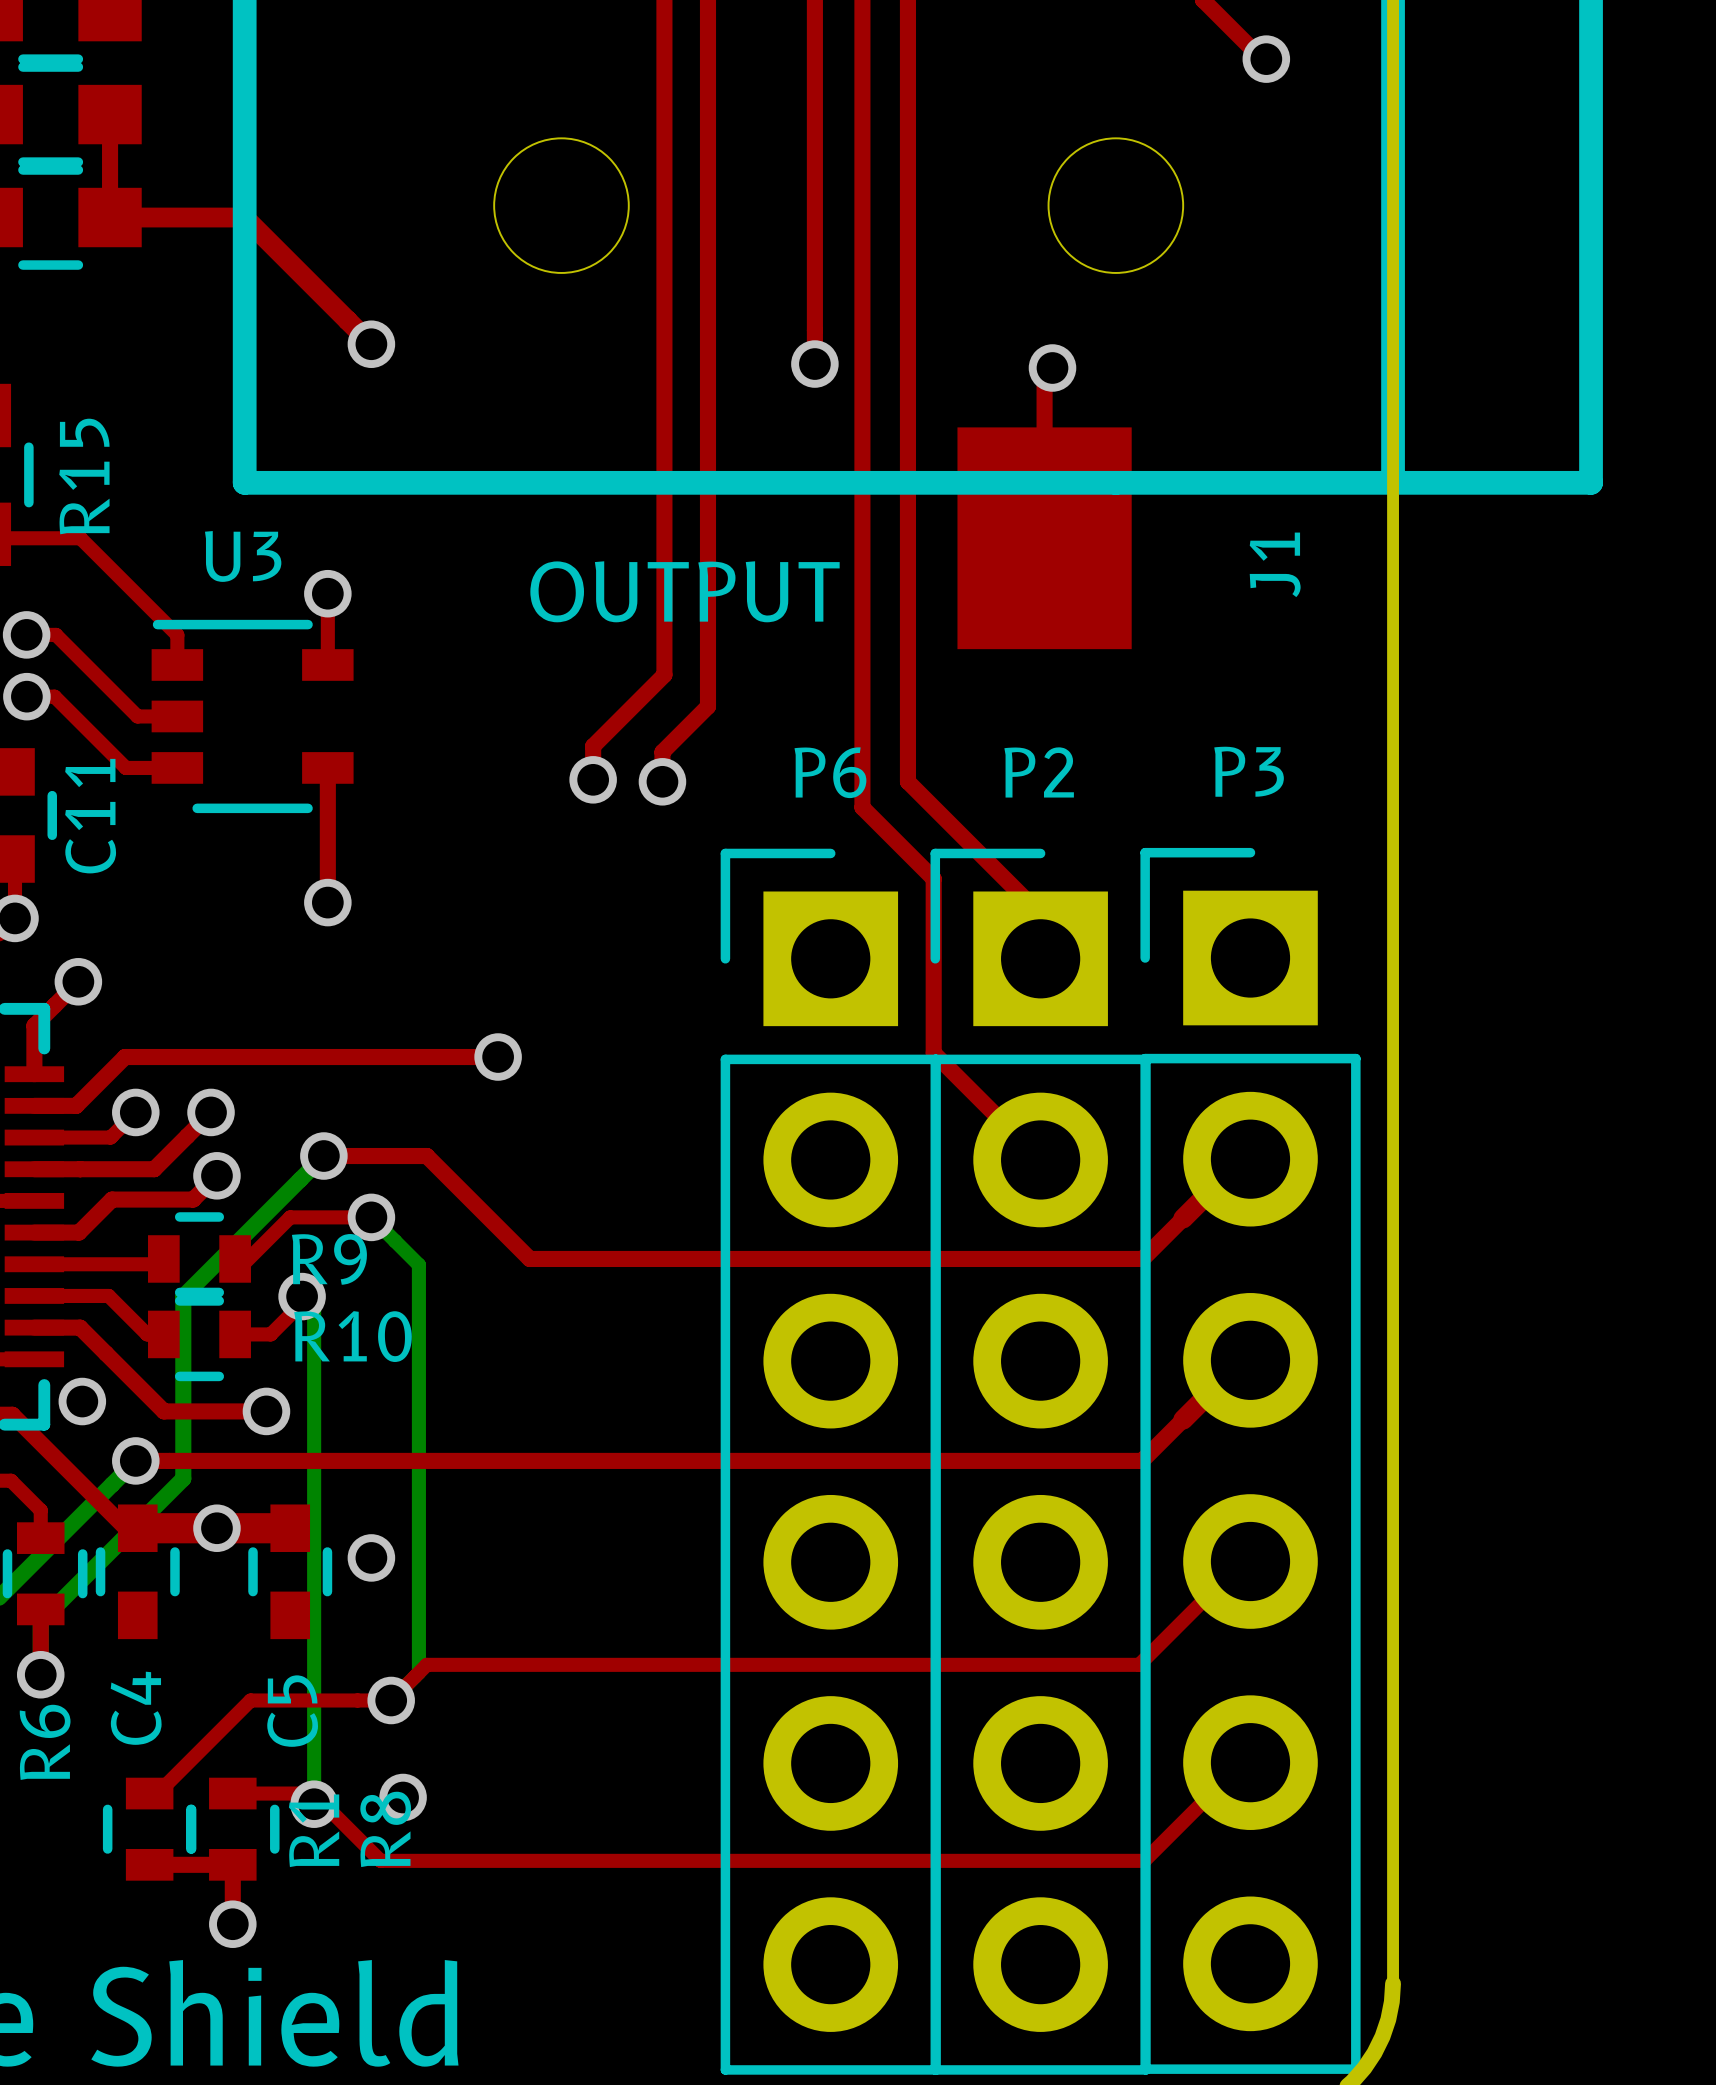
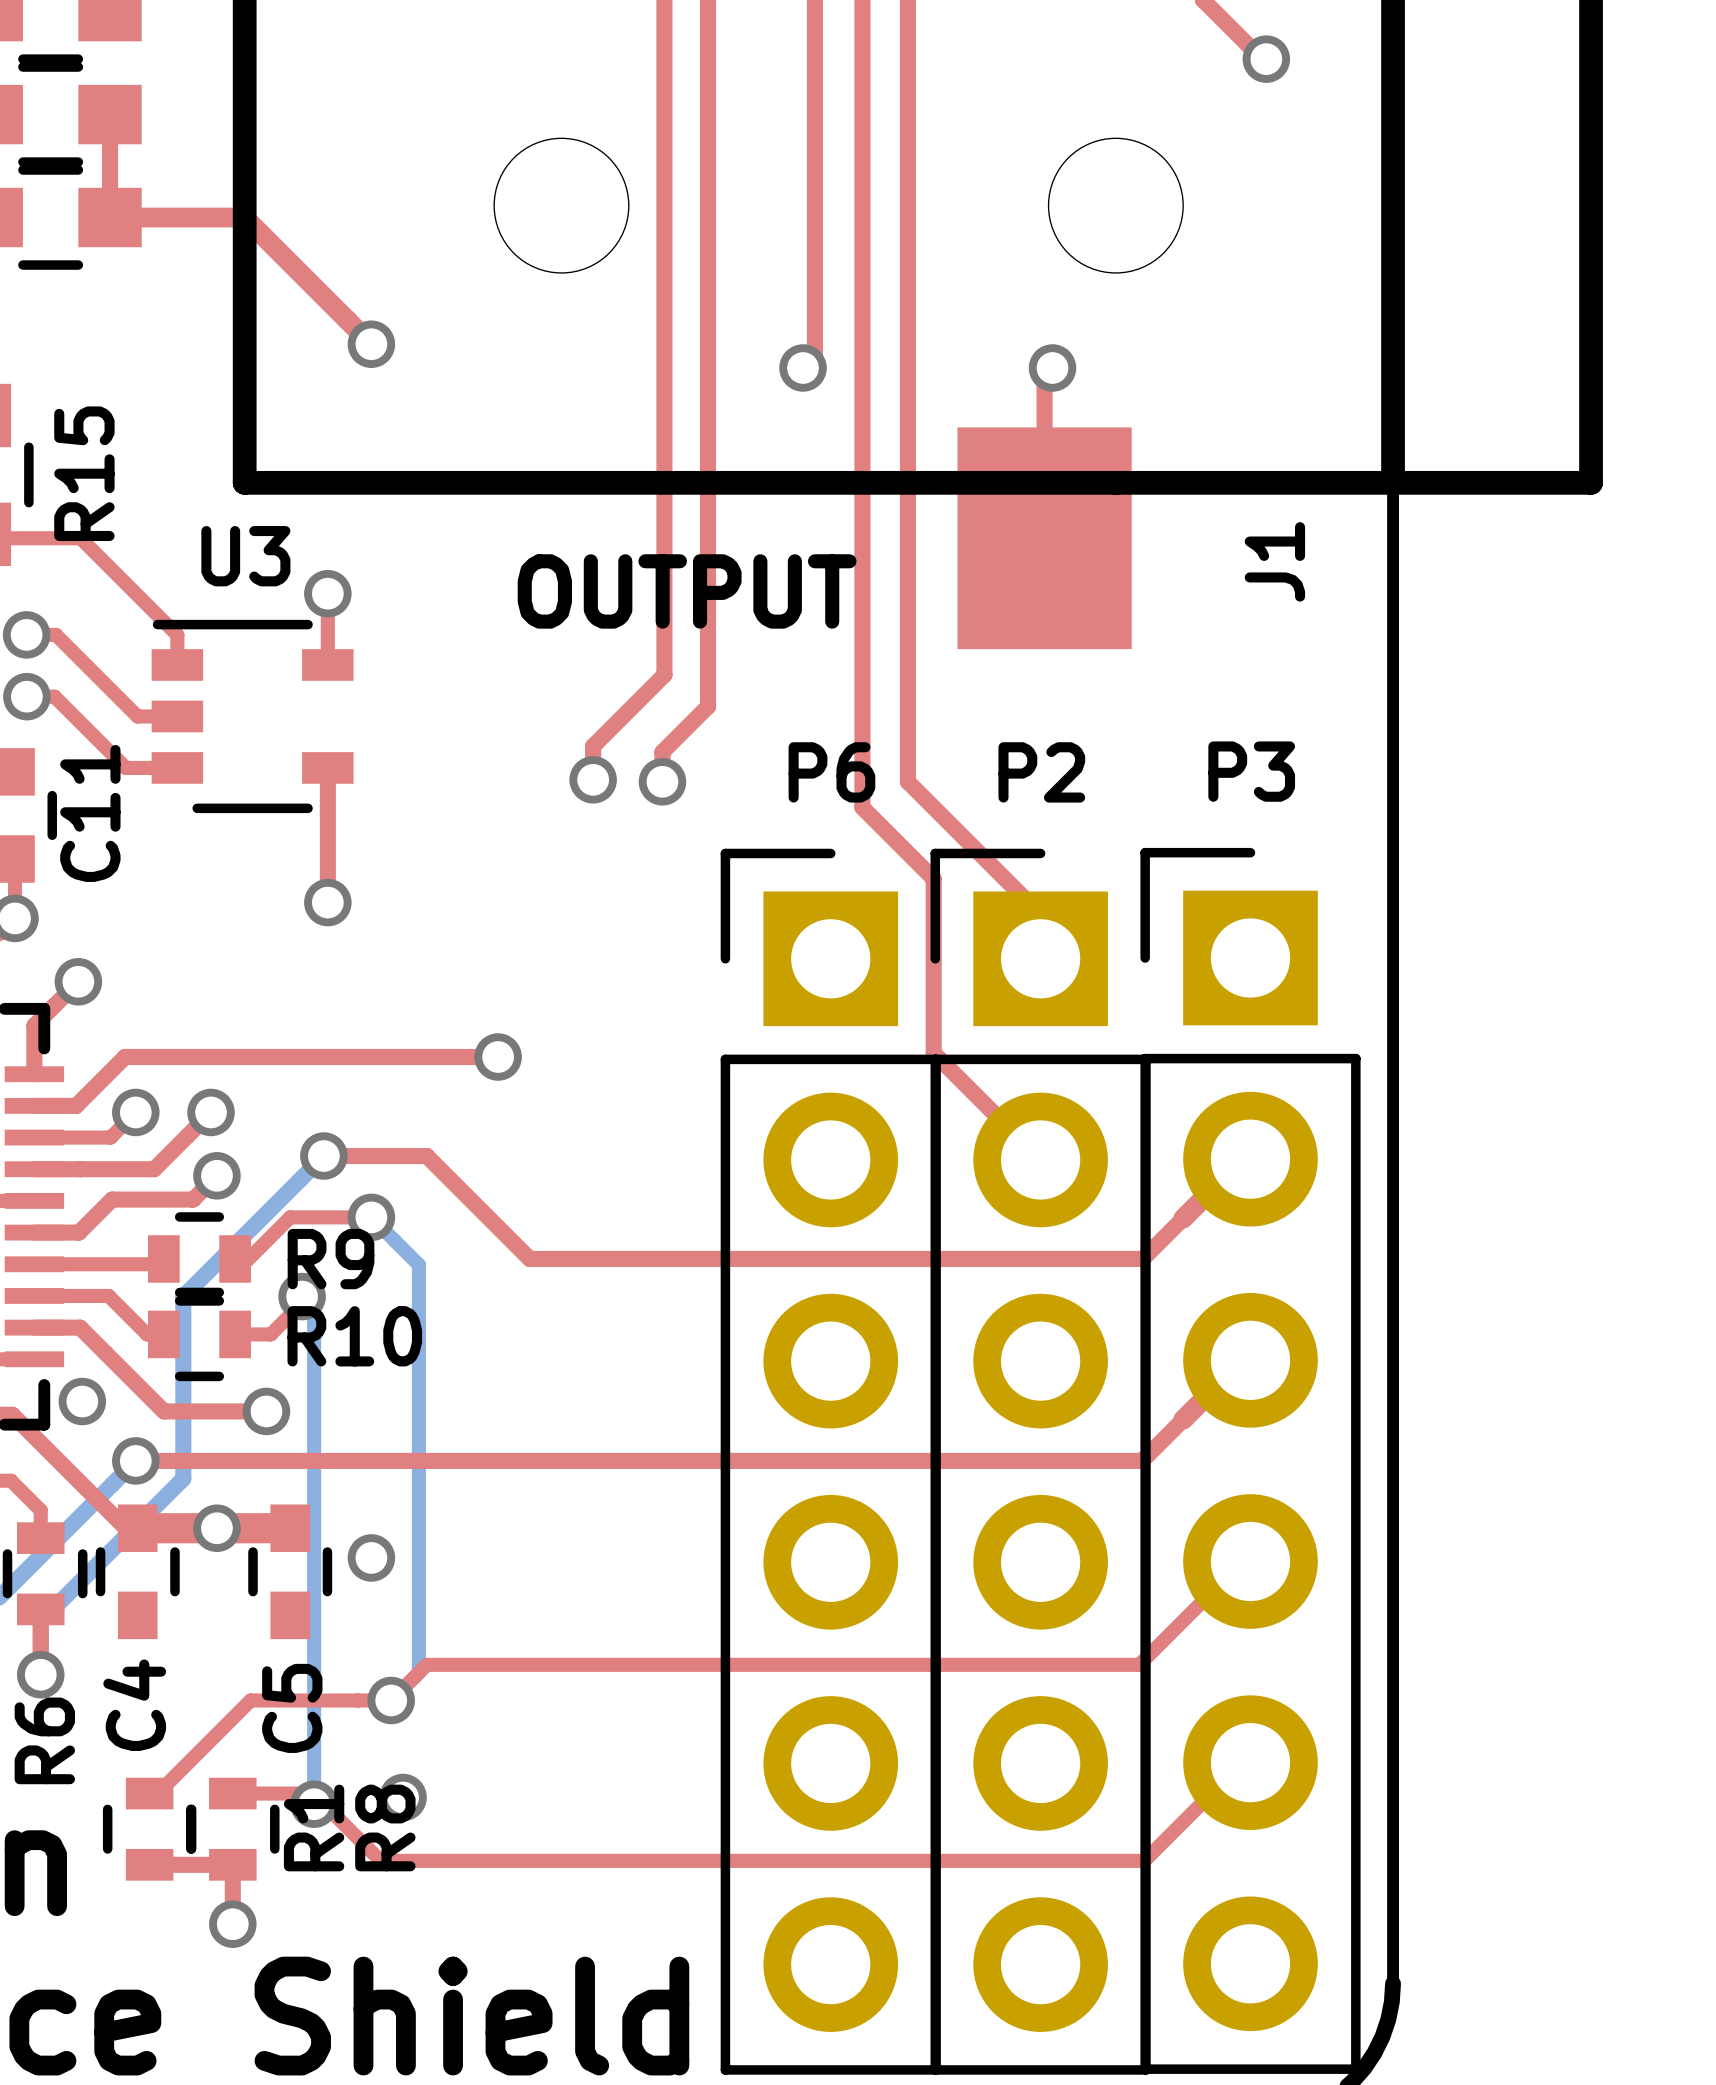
via position: (814, 364) -> (803, 367)

